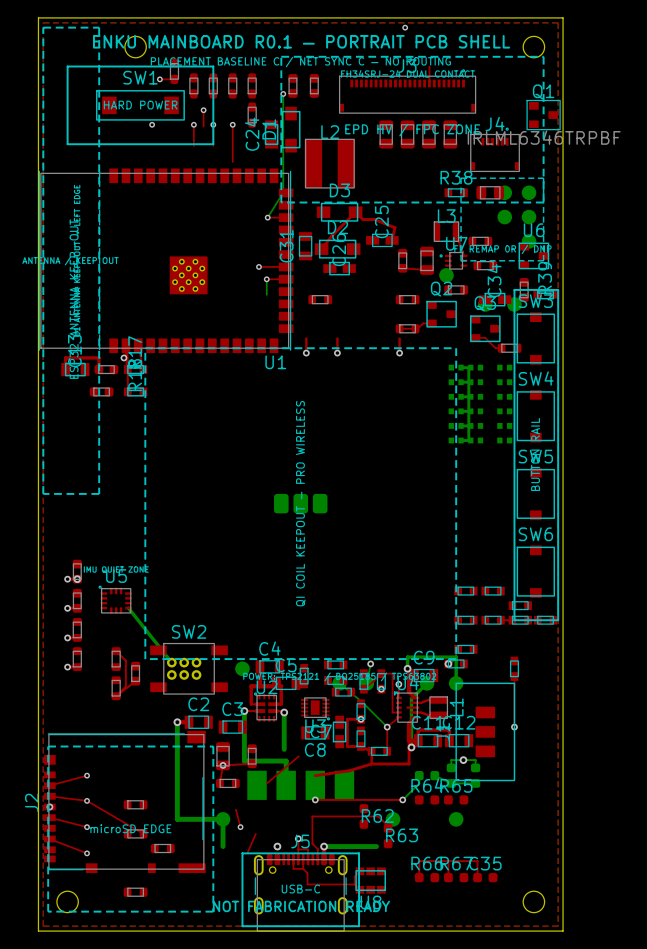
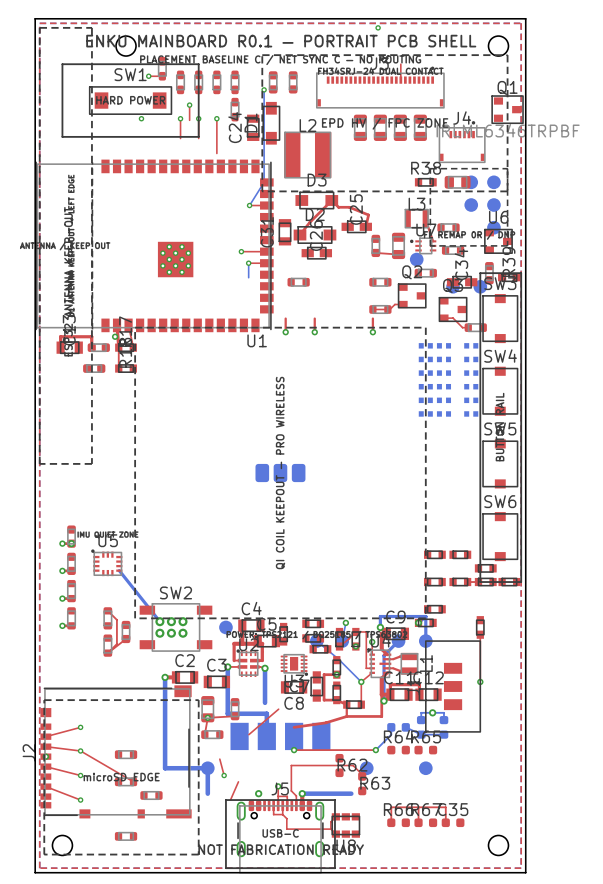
bottom track: (461, 367) (468, 367) (468, 440) (461, 440) -> none
bottom track: (461, 382) (468, 382) -> none
bottom track: (461, 396) (468, 396) -> none
bottom track: (461, 411) (468, 411) -> none
bottom track: (461, 425) (468, 425) -> none

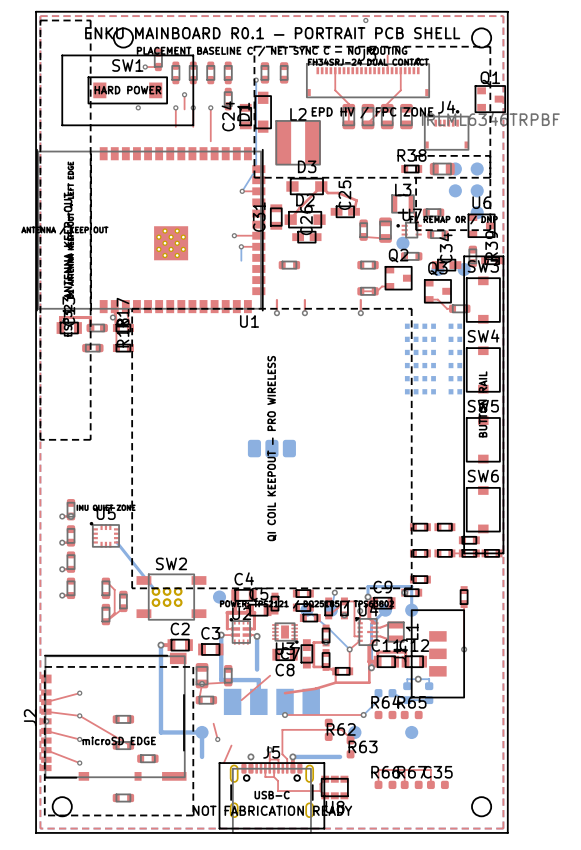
top track: none -> (335, 70) (335, 90) (348, 103) (348, 124)
top track: none -> (400, 70) (400, 90) (368, 124)

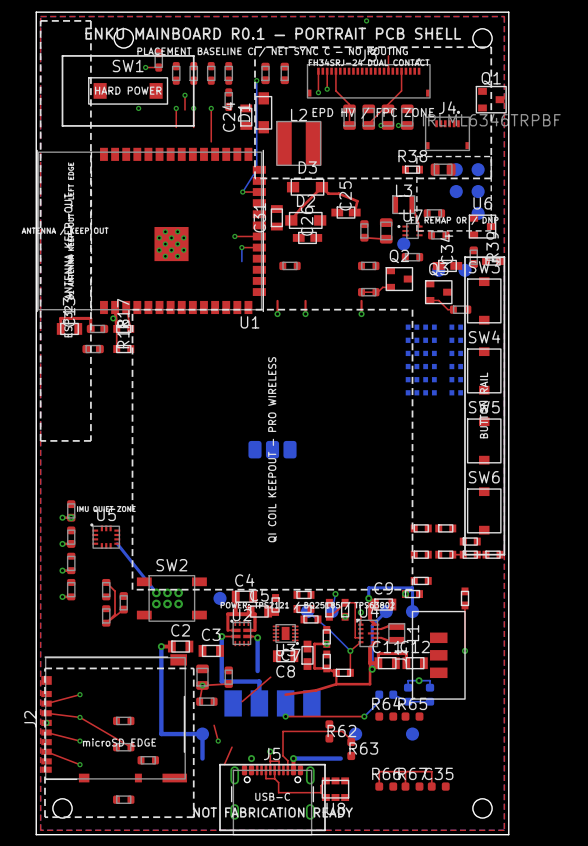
top track: none -> (318, 71) (318, 92)
top track: none -> (327, 71) (327, 89)
via: none -> (327, 89)
via: none -> (318, 92)
via: none -> (381, 125)
via: none -> (398, 125)

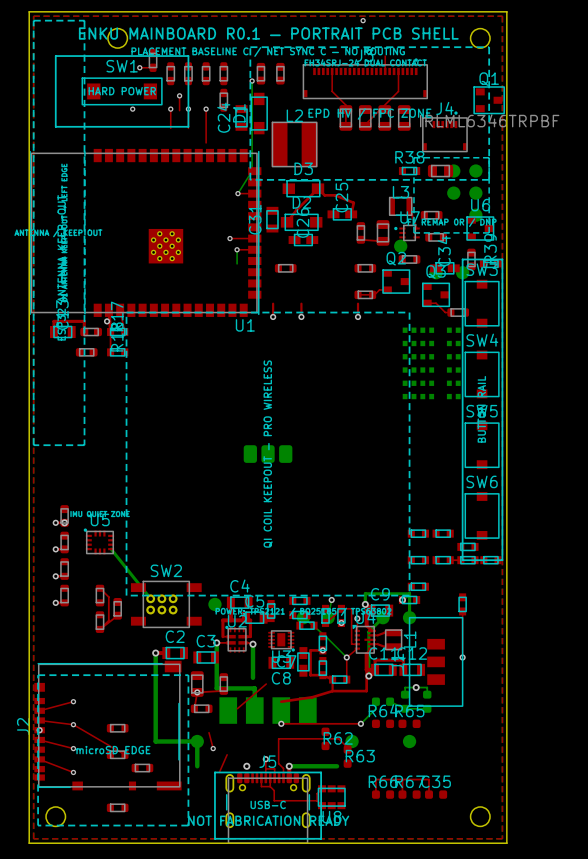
top track: (318, 71) (318, 92) -> none
top track: (327, 71) (327, 89) -> none
via: (327, 89) -> none
via: (318, 92) -> none
via: (381, 125) -> none
via: (398, 125) -> none

